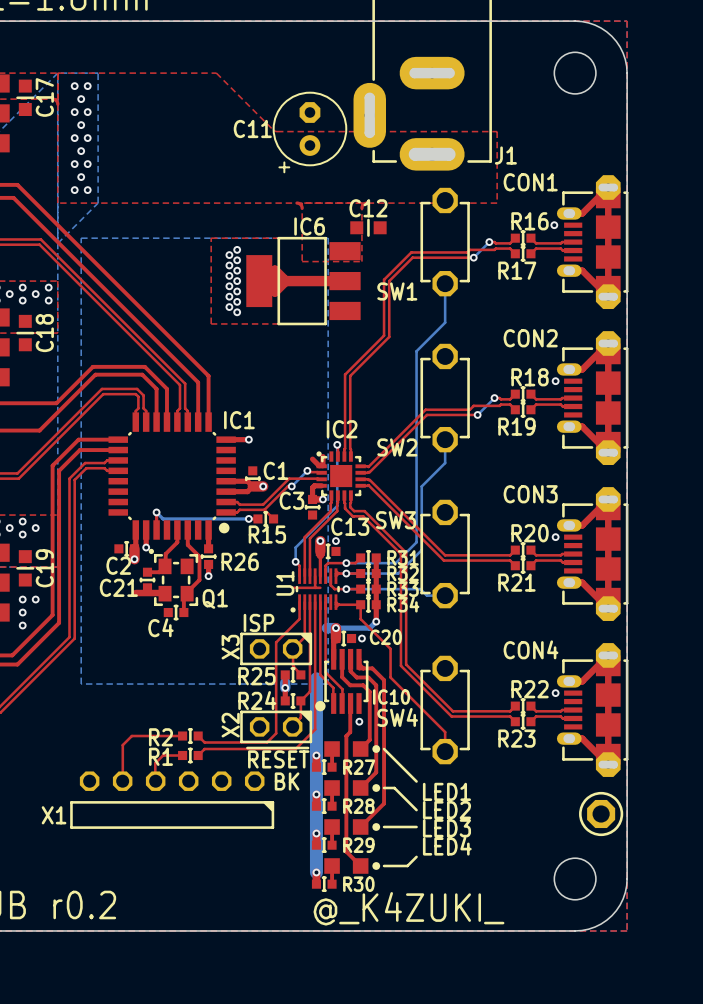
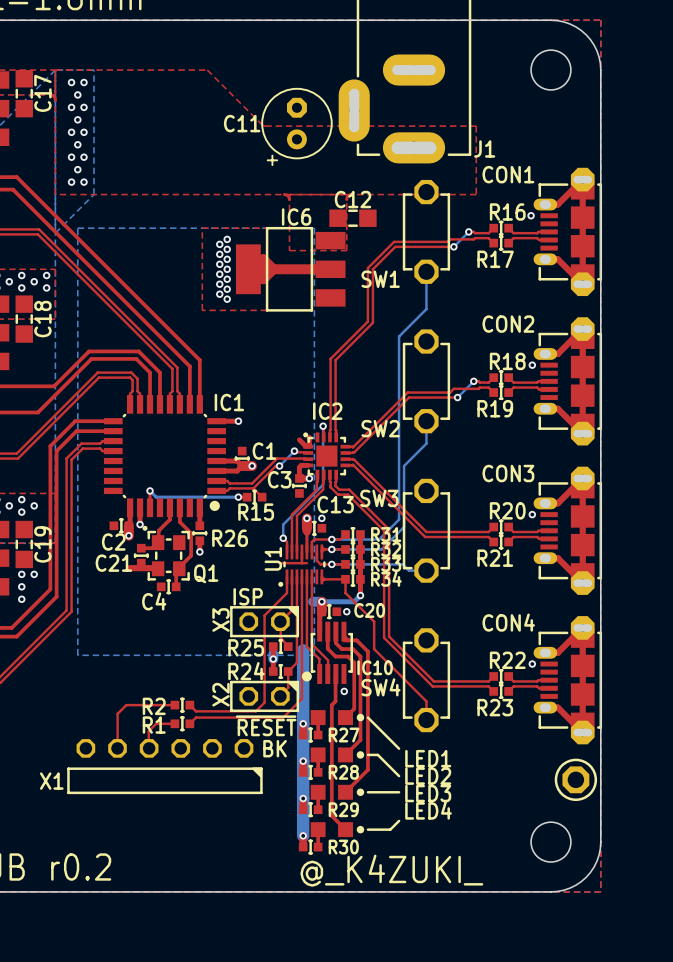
C17 footprint: [16, 79, 35, 117] -> [15, 70, 33, 118]
C12 footprint: [350, 218, 387, 237] -> [329, 209, 377, 227]
C18 footprint: [16, 314, 35, 352] -> [15, 295, 33, 343]
C19 footprint: [16, 550, 35, 587] -> [15, 520, 33, 569]

